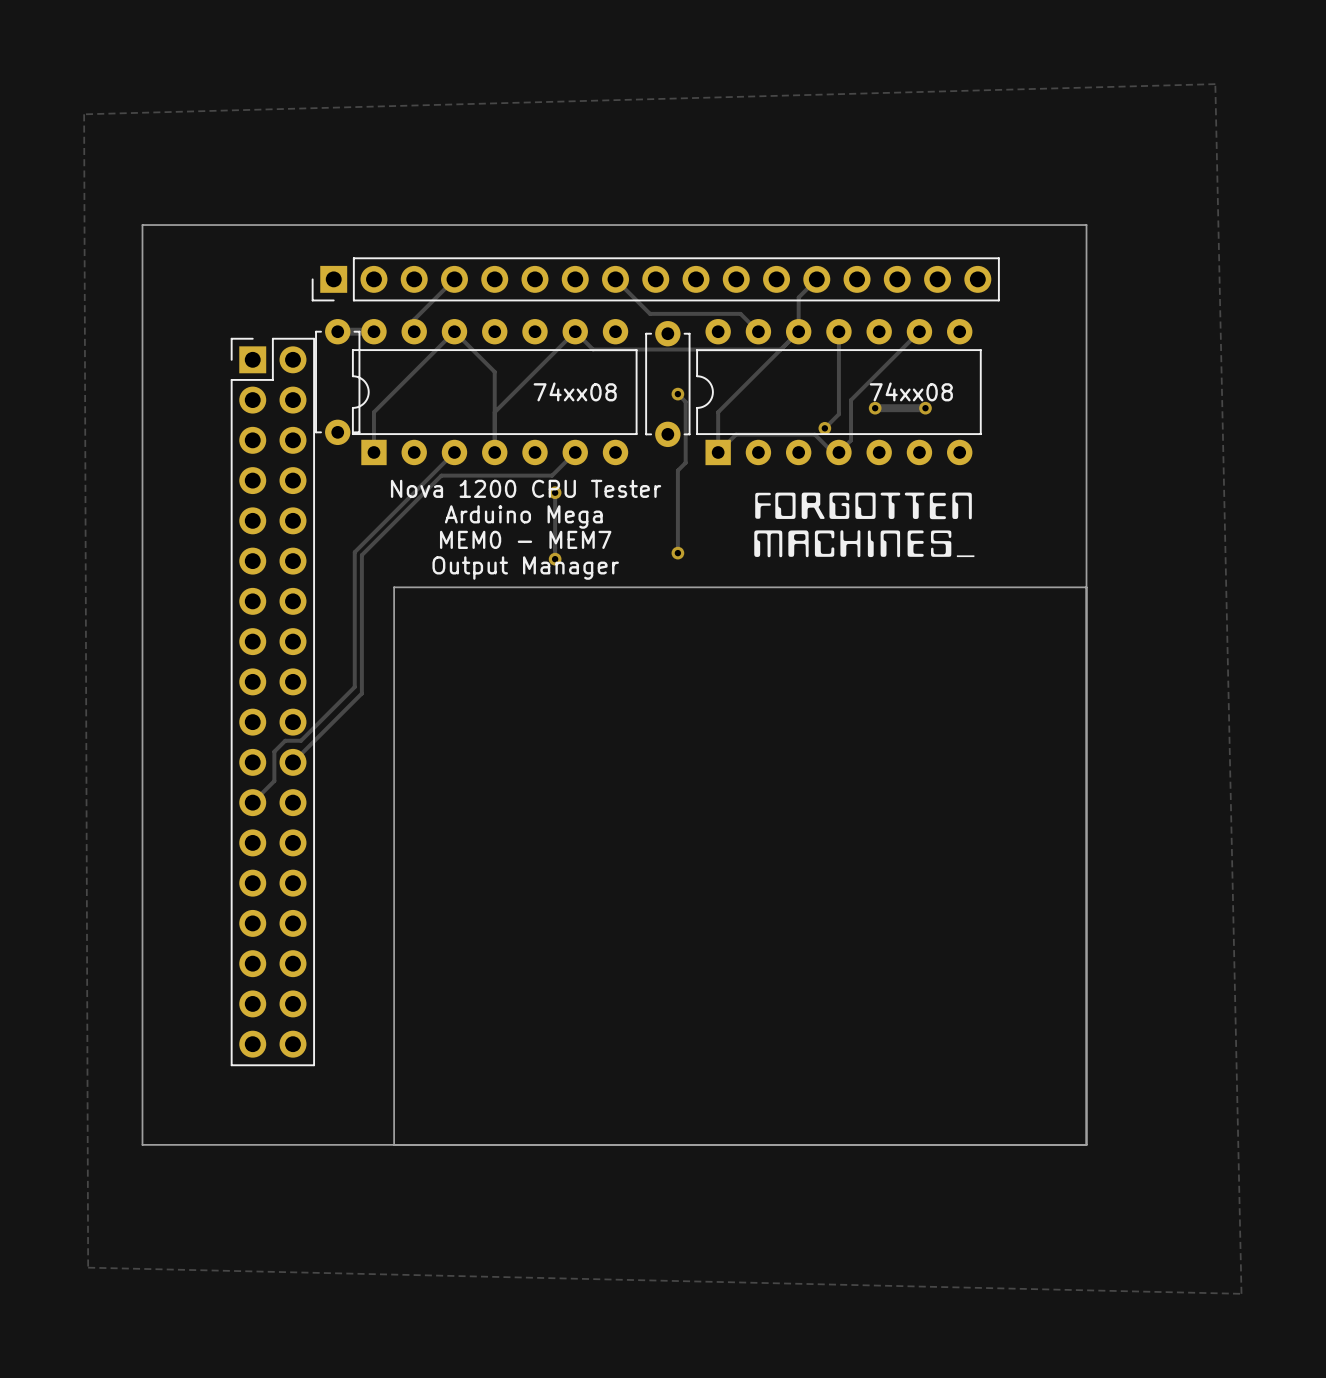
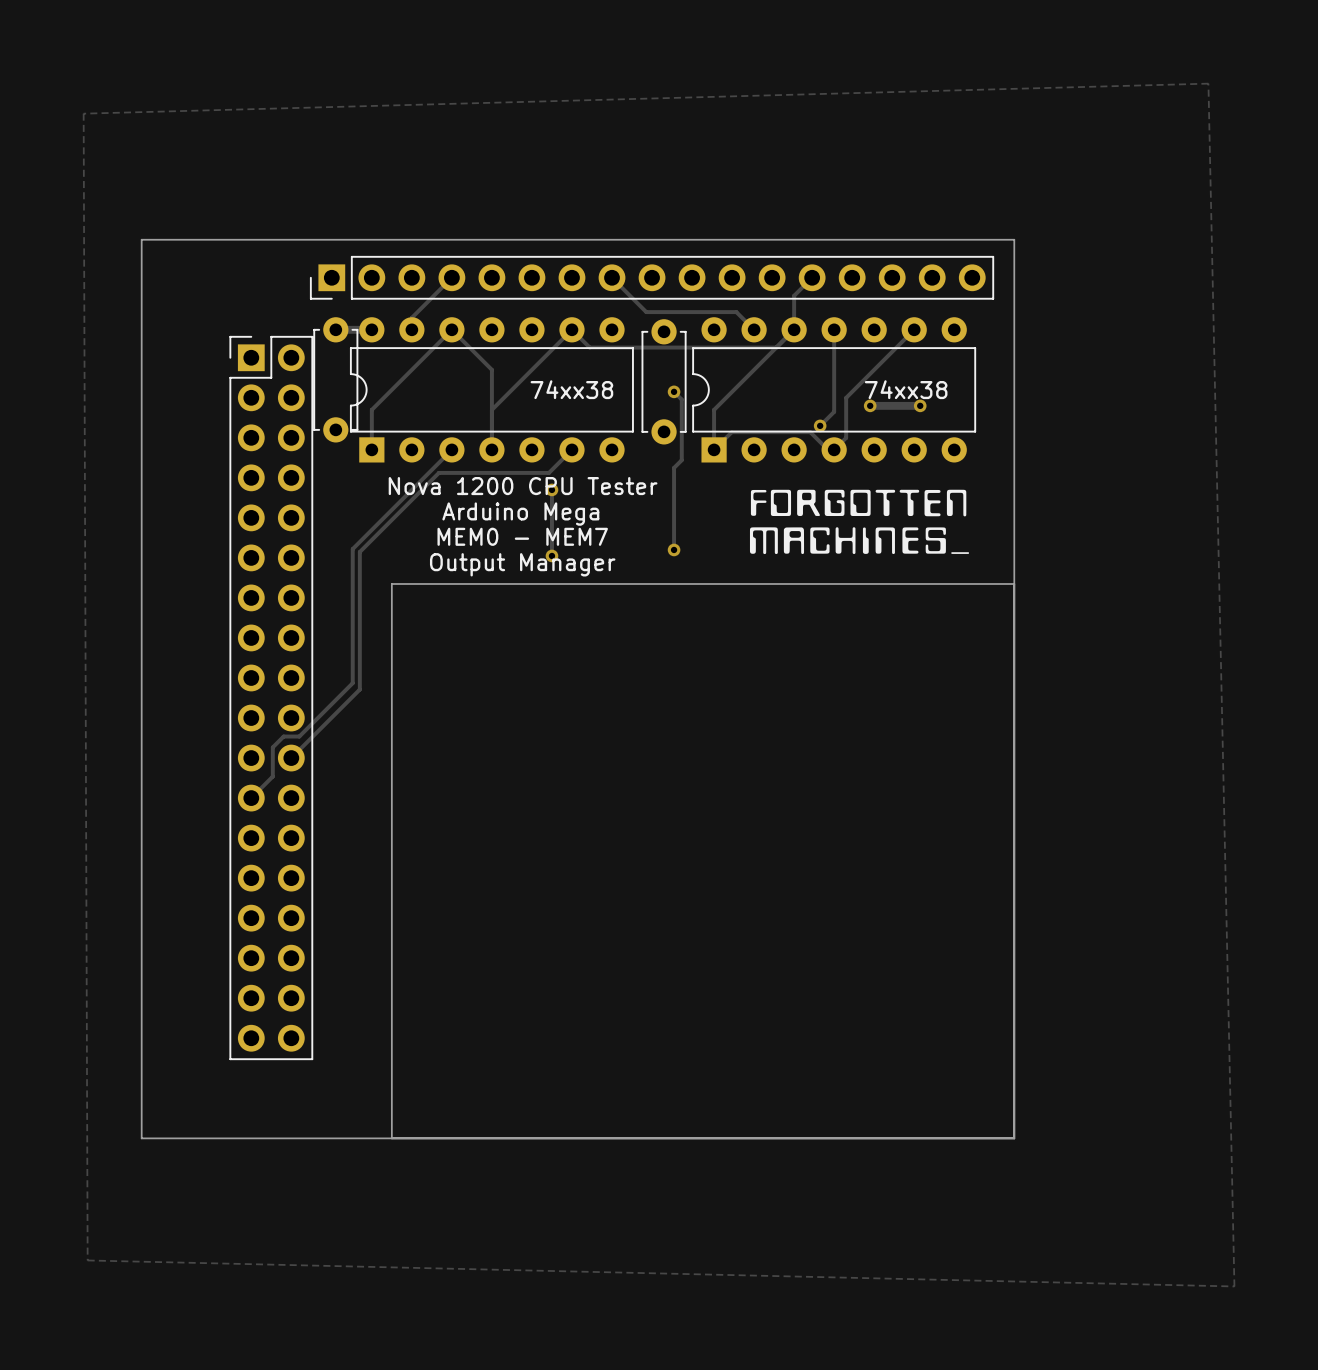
board edge: (142, 241) (142, 225) (1086, 225) (1086, 1144) (1020, 1144) -> (141, 239) (1014, 239) (1014, 1138)
text: 74xx08 (575, 391) -> 74xx38 (571, 389)
text: 74xx08 (911, 391) -> 74xx38 (906, 389)
board edge: (1020, 587) (1086, 587) -> none

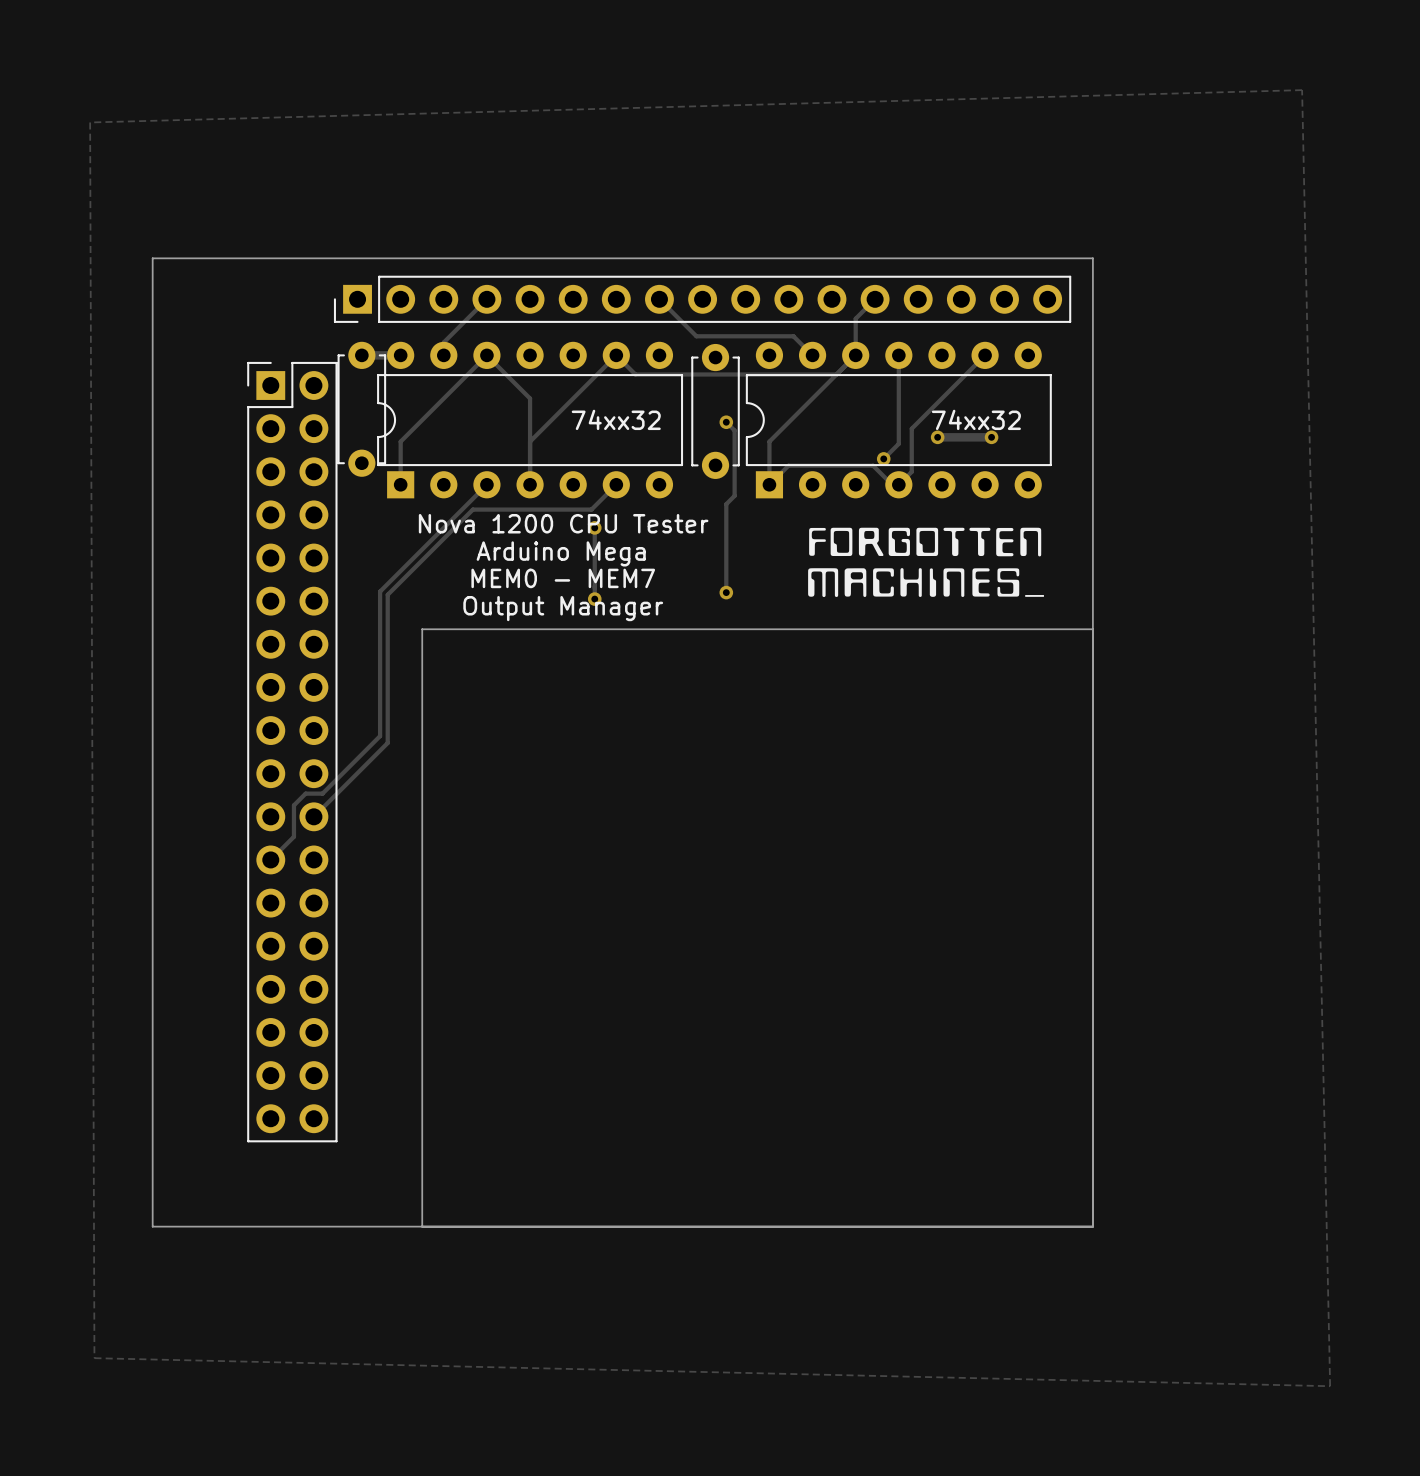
text: 74xx38 (571, 389) -> 74xx32 (616, 419)
text: 74xx38 (906, 389) -> 74xx32 (976, 419)

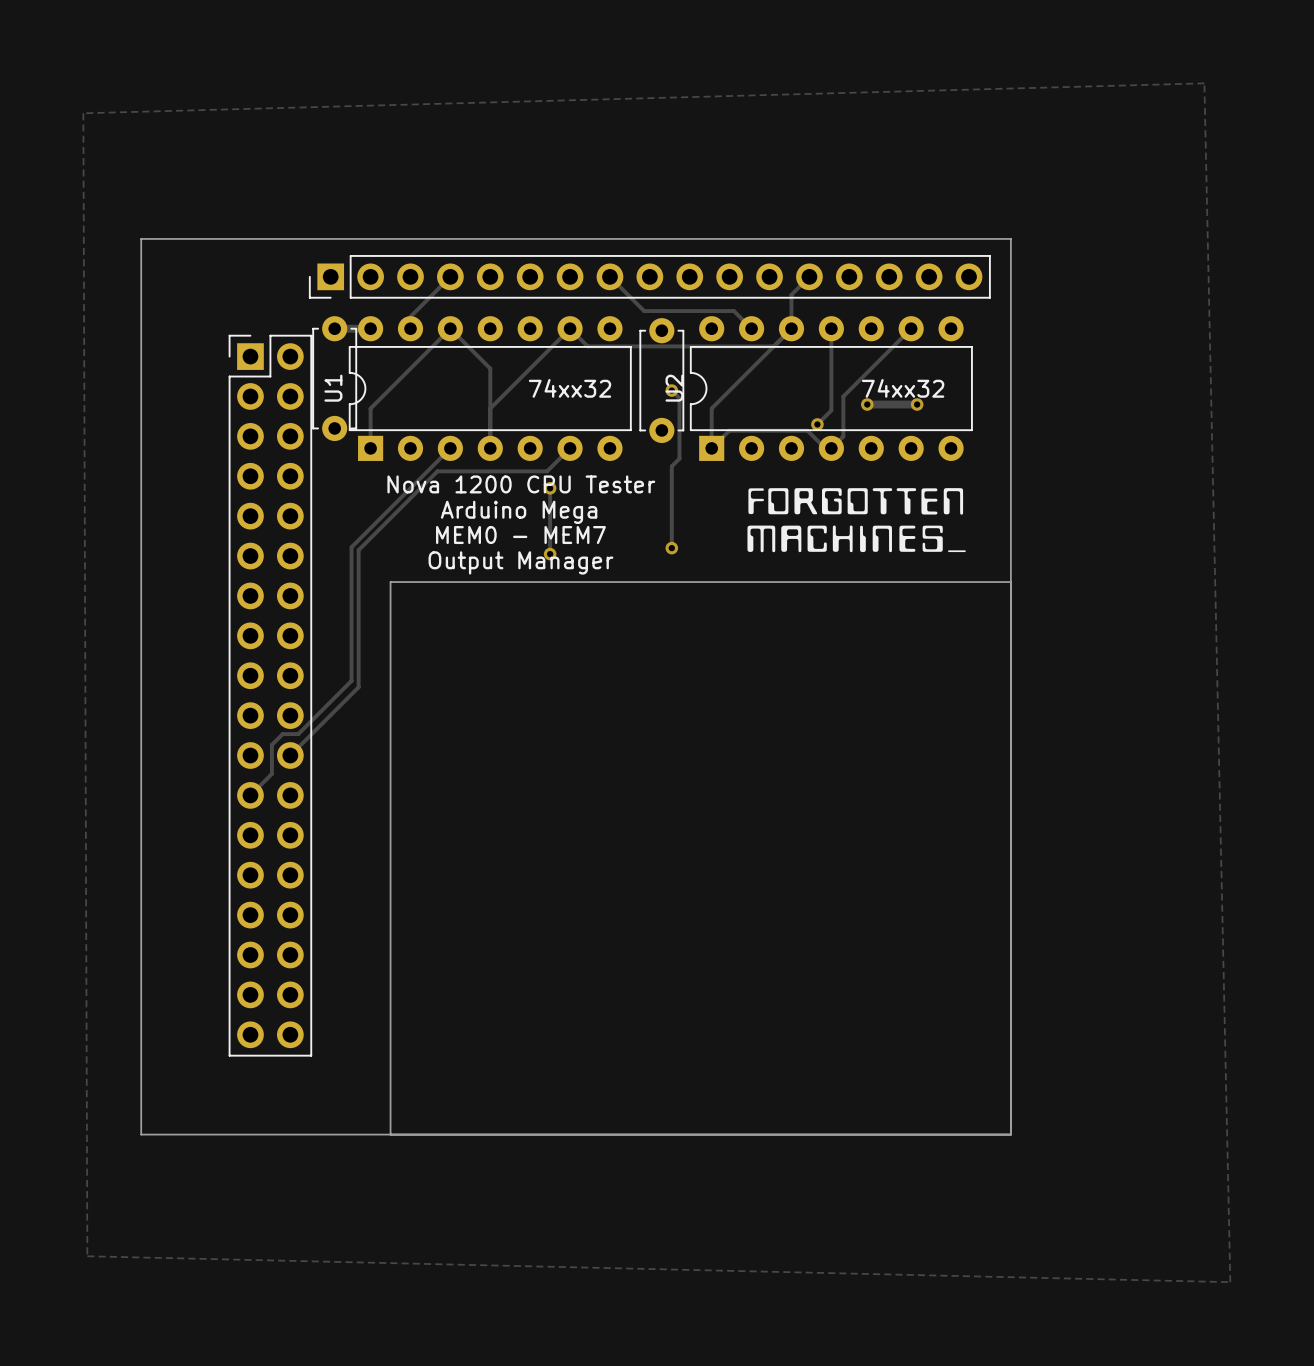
U1 name: none -> U1 (333, 388)
U2 name: none -> U2 (674, 388)

